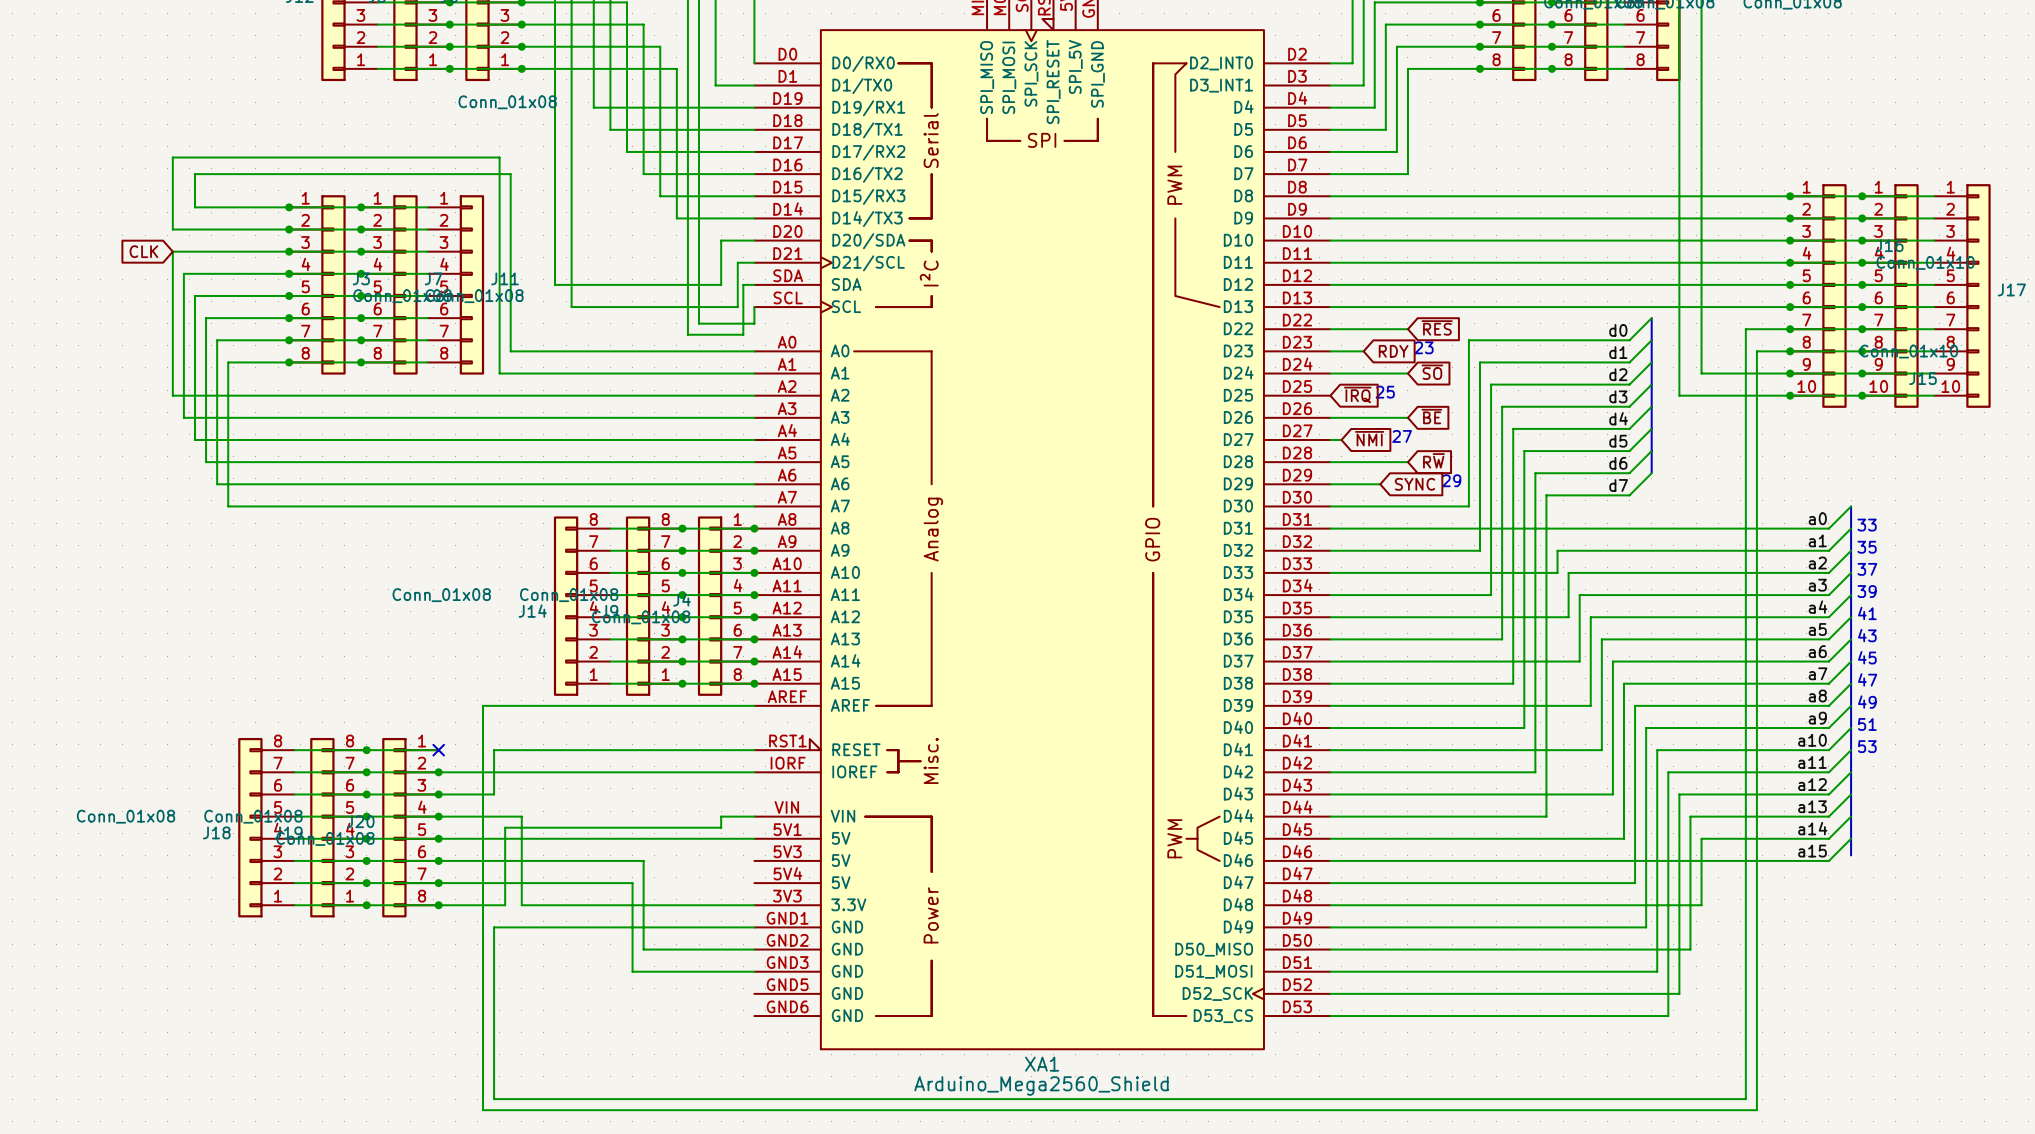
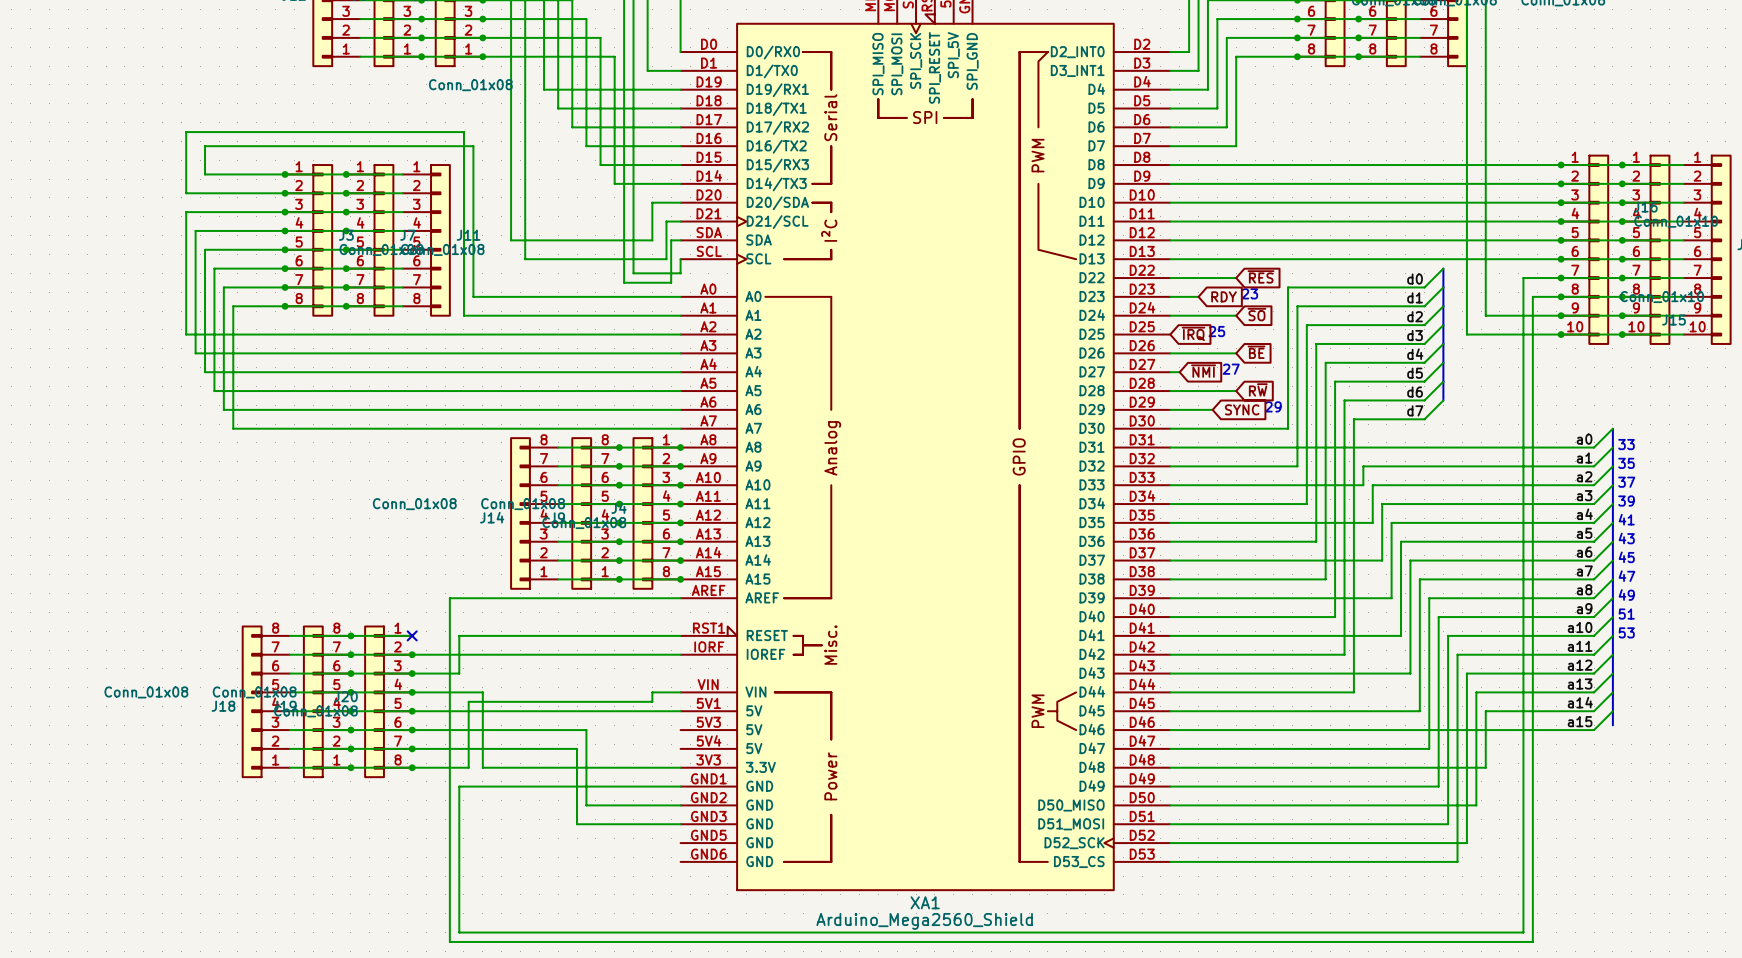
global label: CLK (143, 251) -> none

